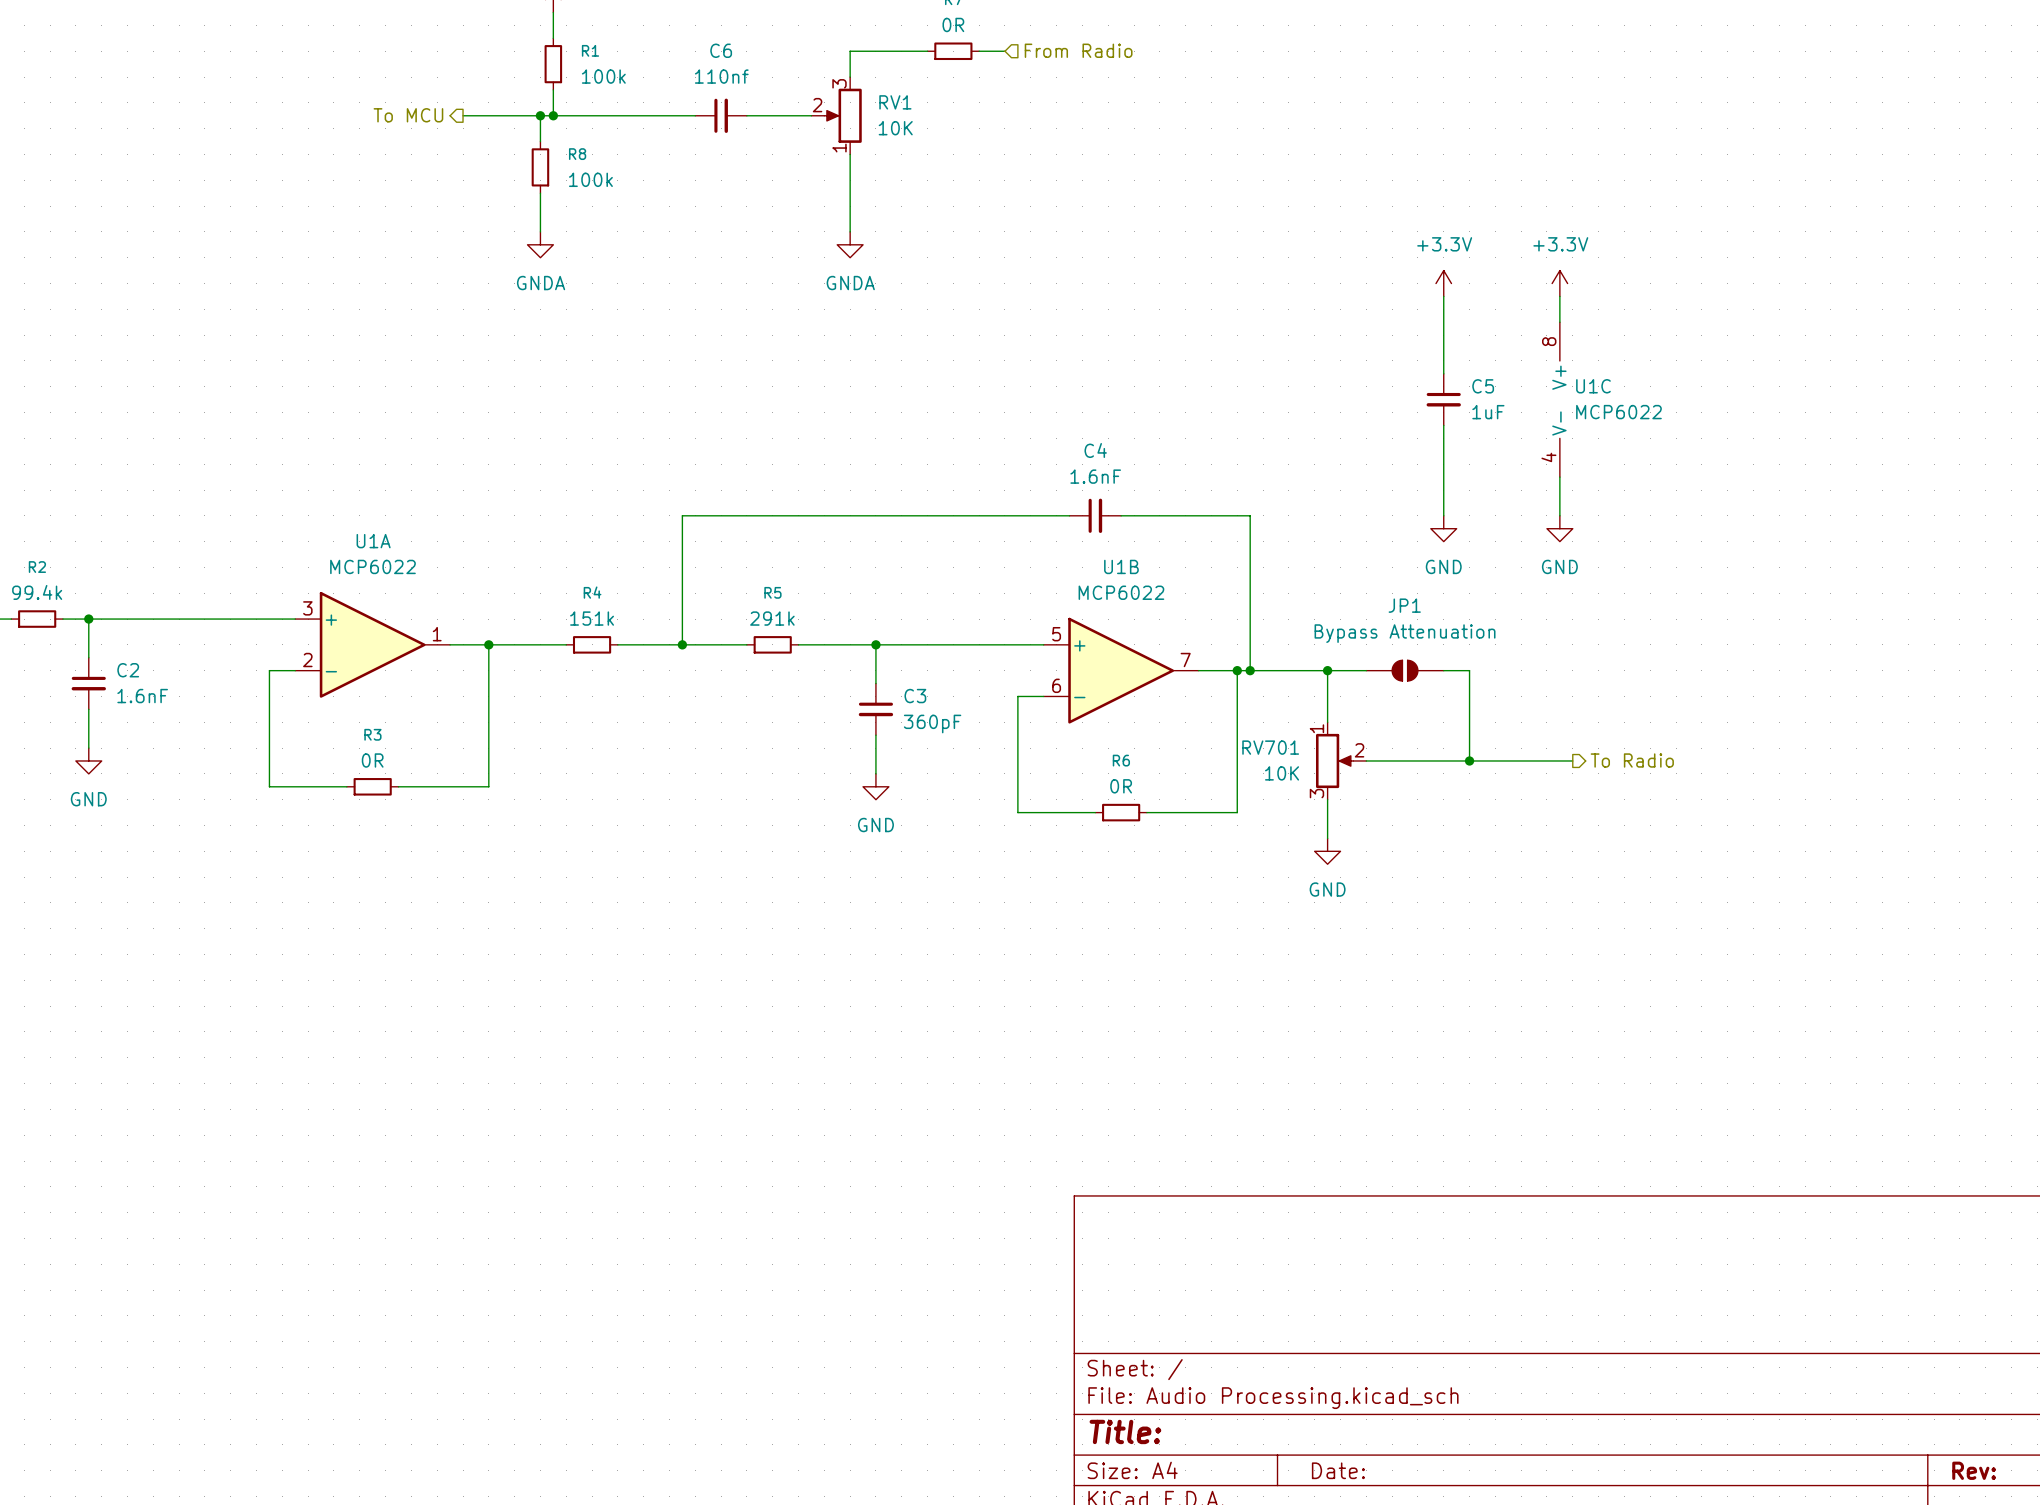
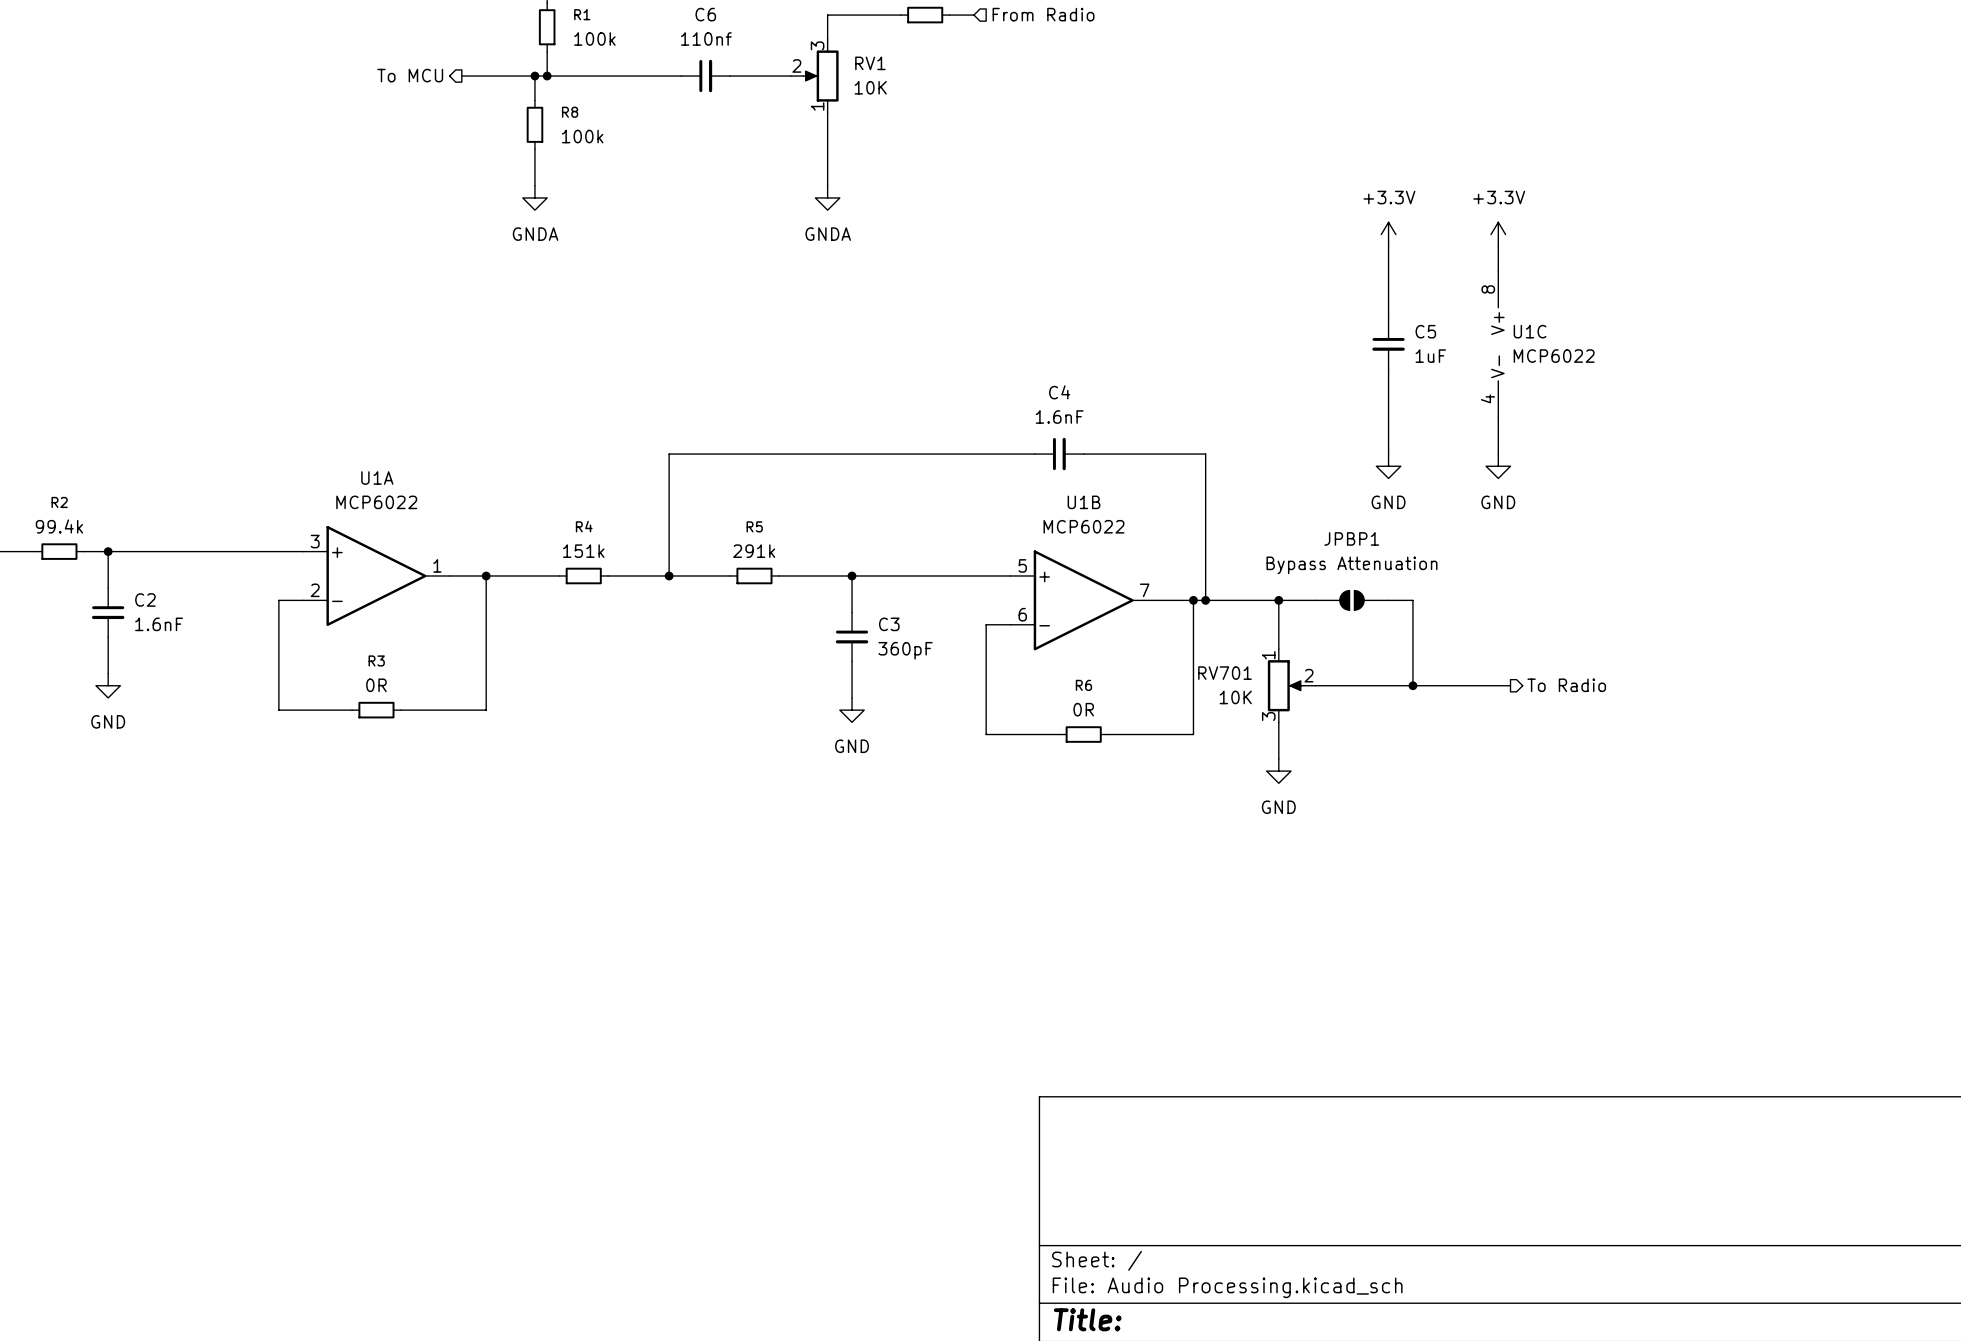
JP1 name: JP1 (1404, 605) -> JPBP1 (1351, 538)

